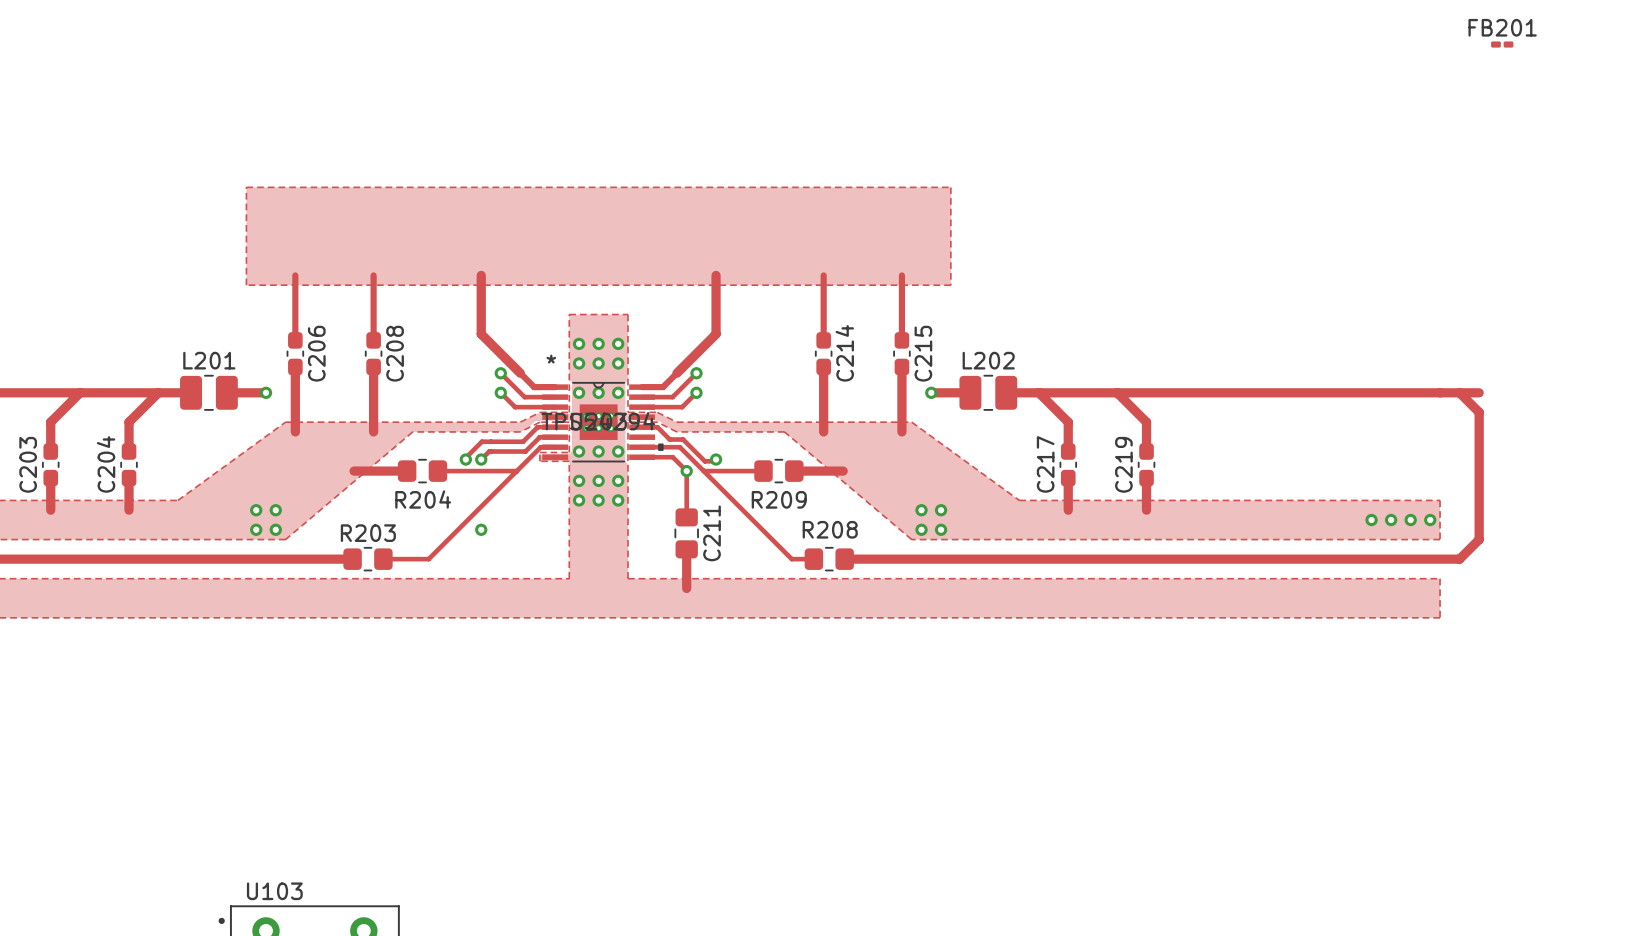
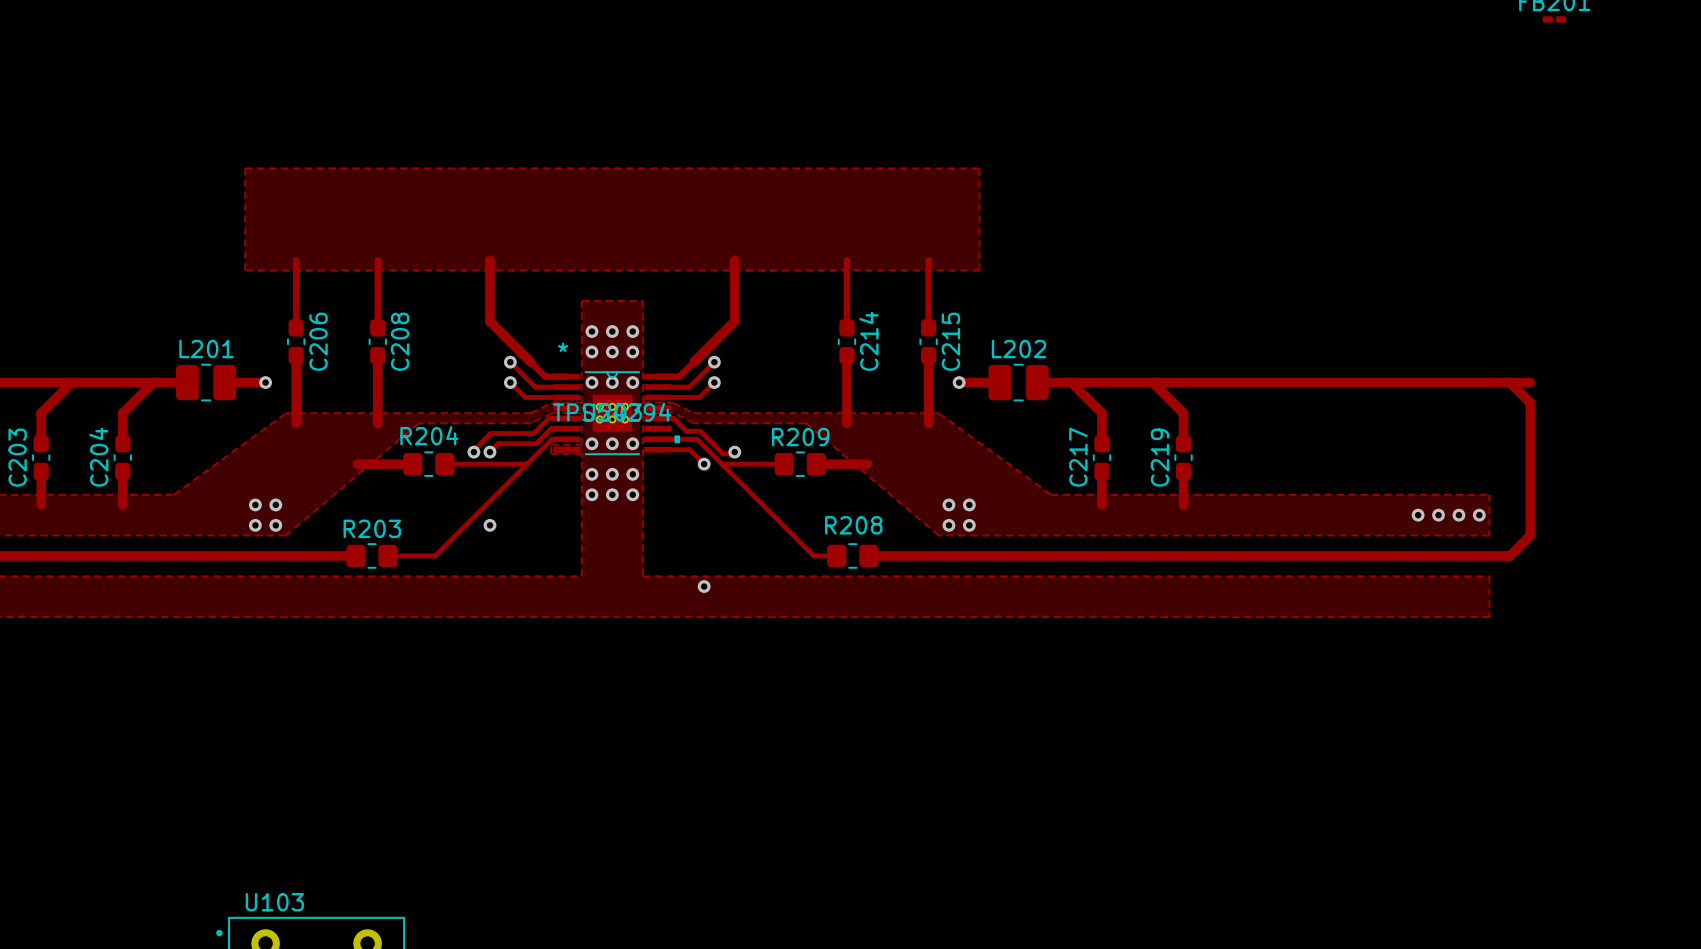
track: (686, 471) (686, 517) -> none
R204 name position: R204 (423, 499) -> R204 (429, 435)
R209 name position: R209 (779, 499) -> R209 (800, 437)
C211: (686, 533) -> none
track: (686, 549) (686, 588) -> none
via: none -> (704, 586)

